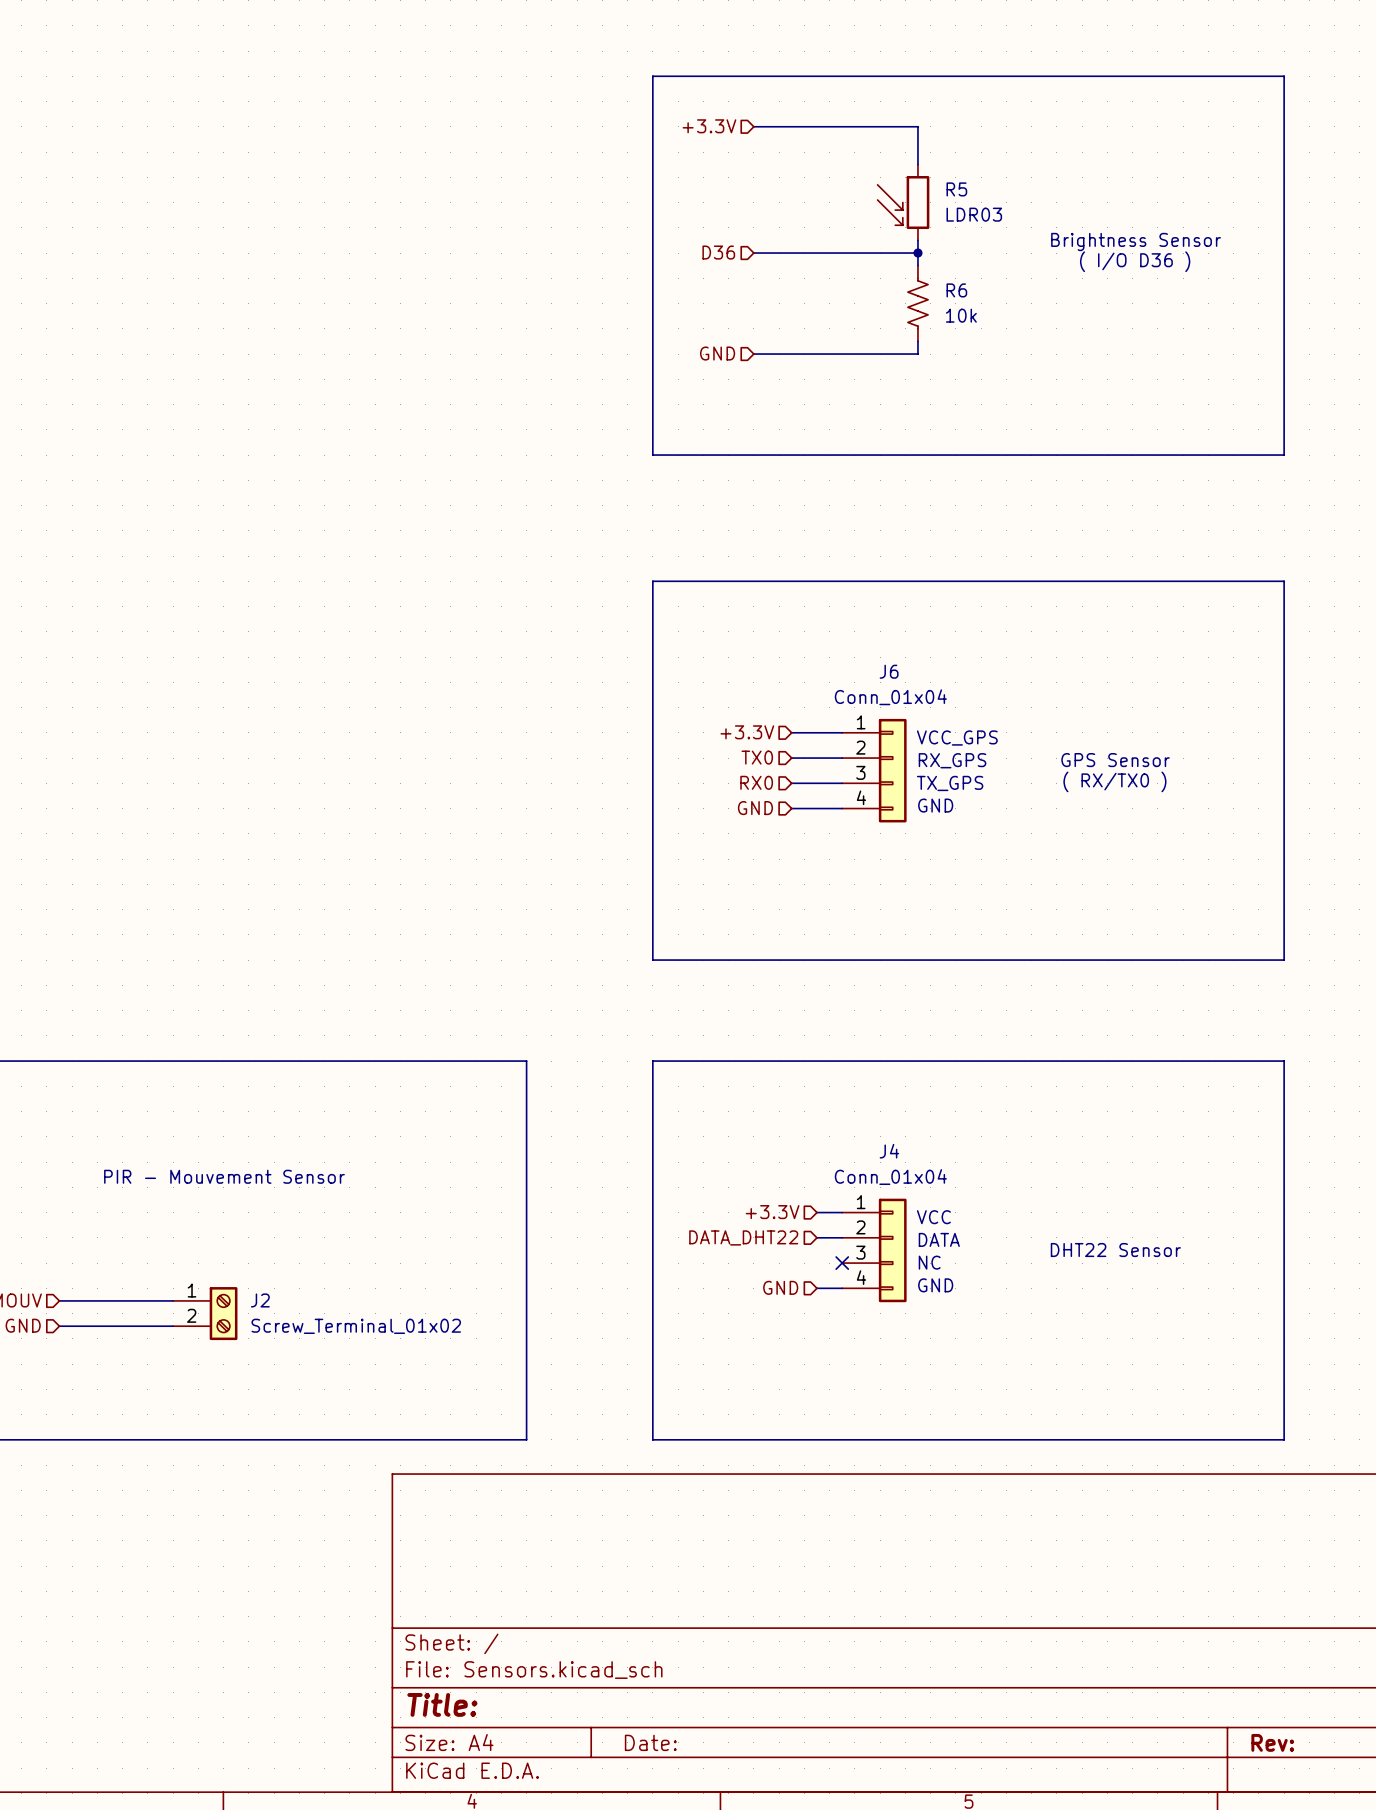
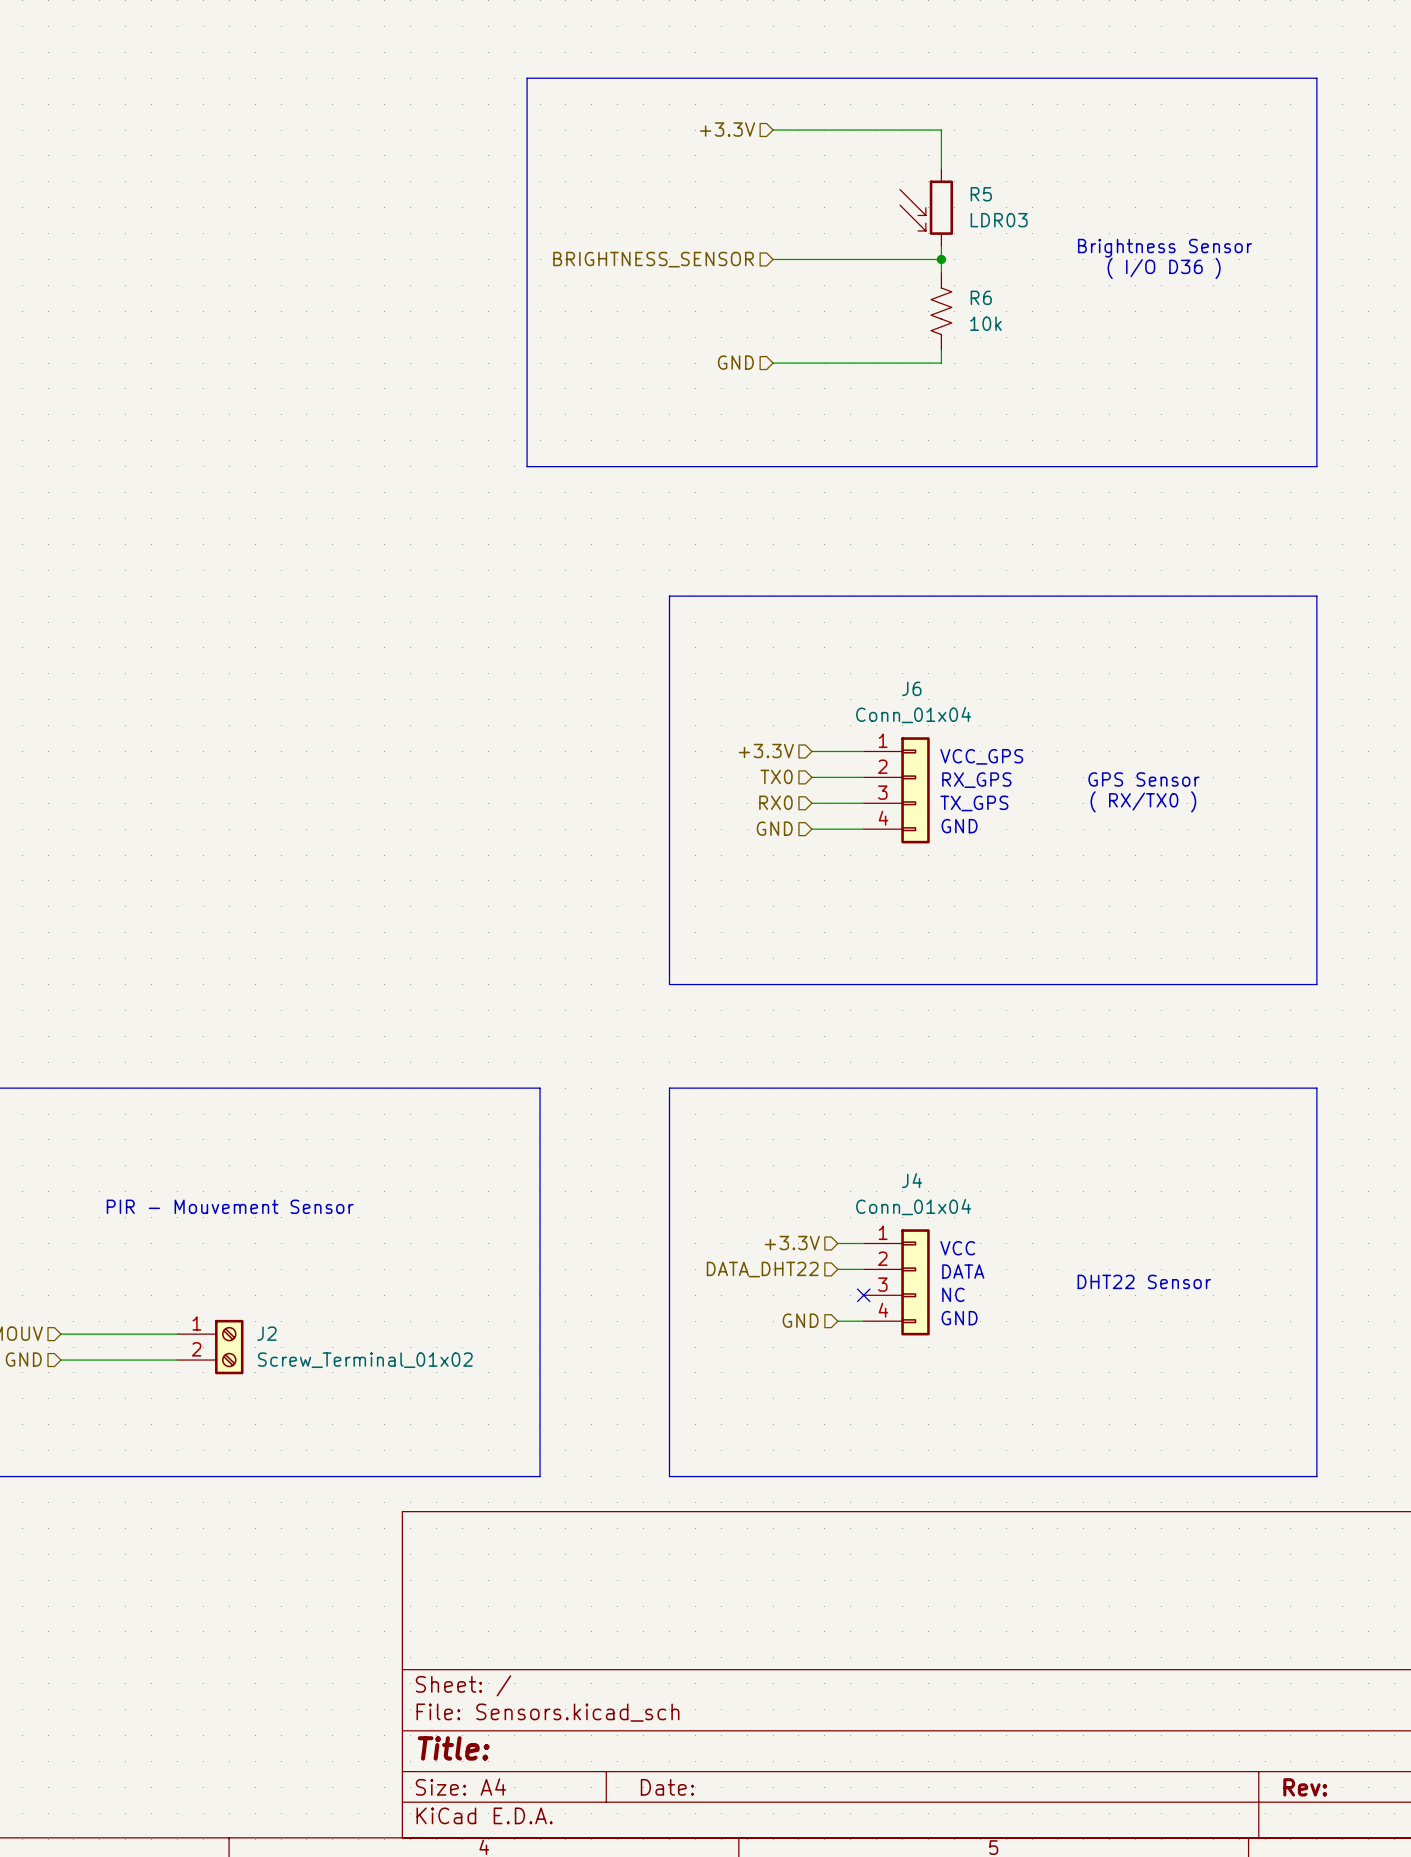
line: (652, 76) (652, 455) -> (669, 78) (527, 78) (527, 466) (669, 466)
hierarchical label: D36 (718, 252) -> BRIGHTNESS_SENSOR (653, 259)

